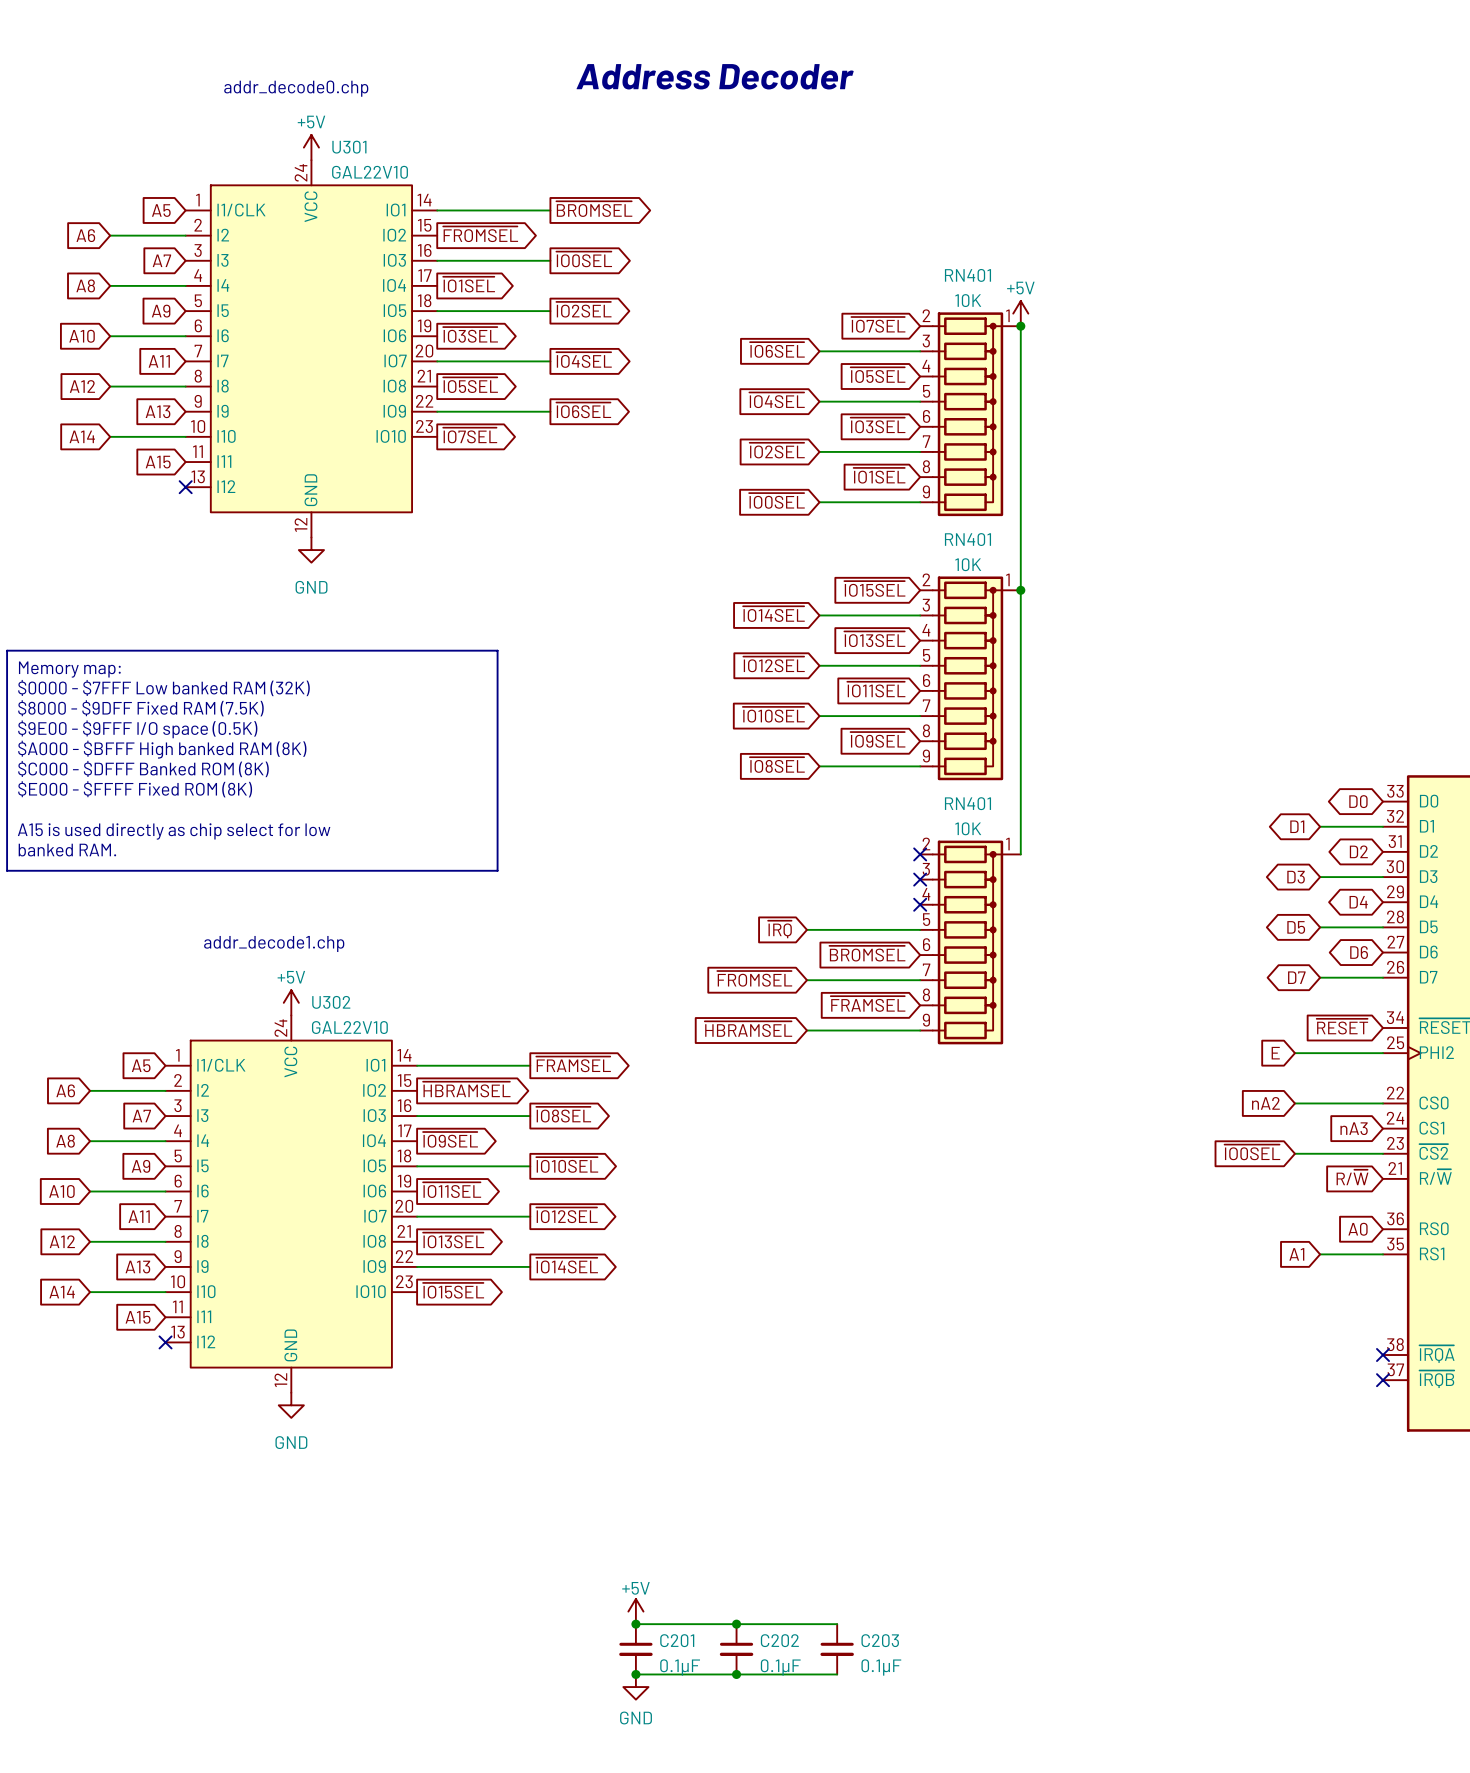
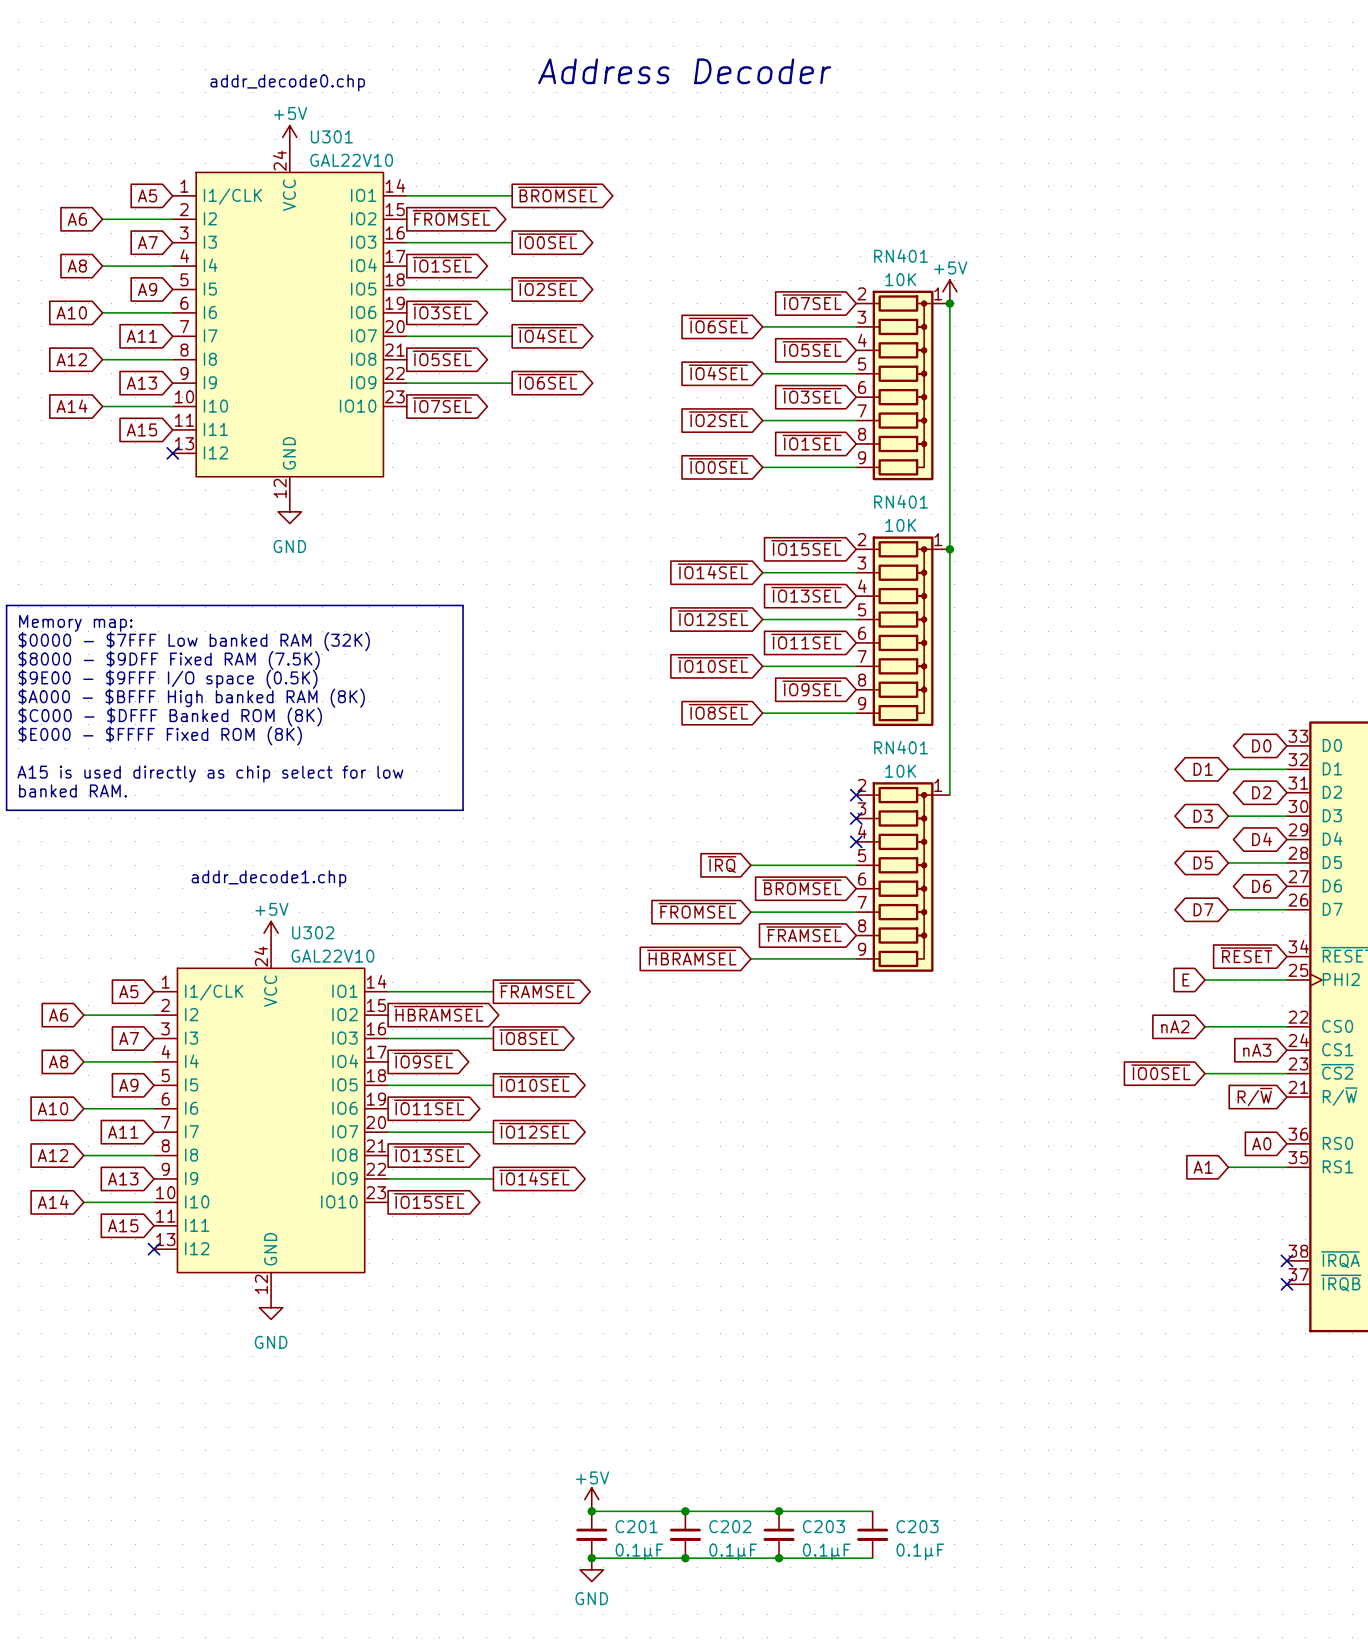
wire: none -> (779, 1511) (872, 1511)
junction: none -> (779, 1511)
C203: none -> 0.1µF (872, 1534)
wire: none -> (779, 1558) (872, 1558)
junction: none -> (779, 1558)

